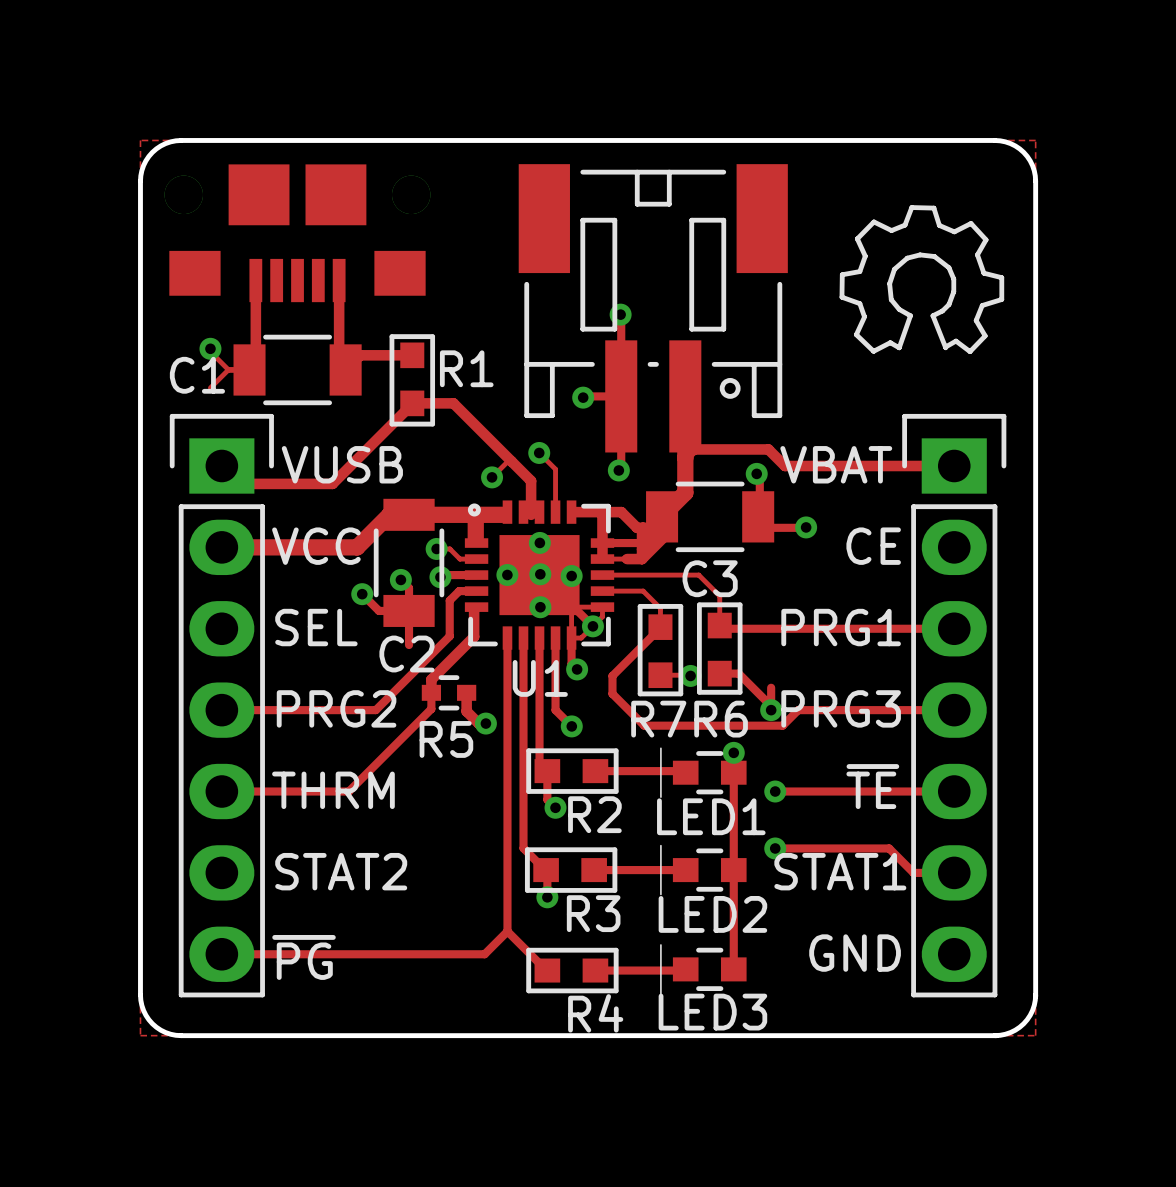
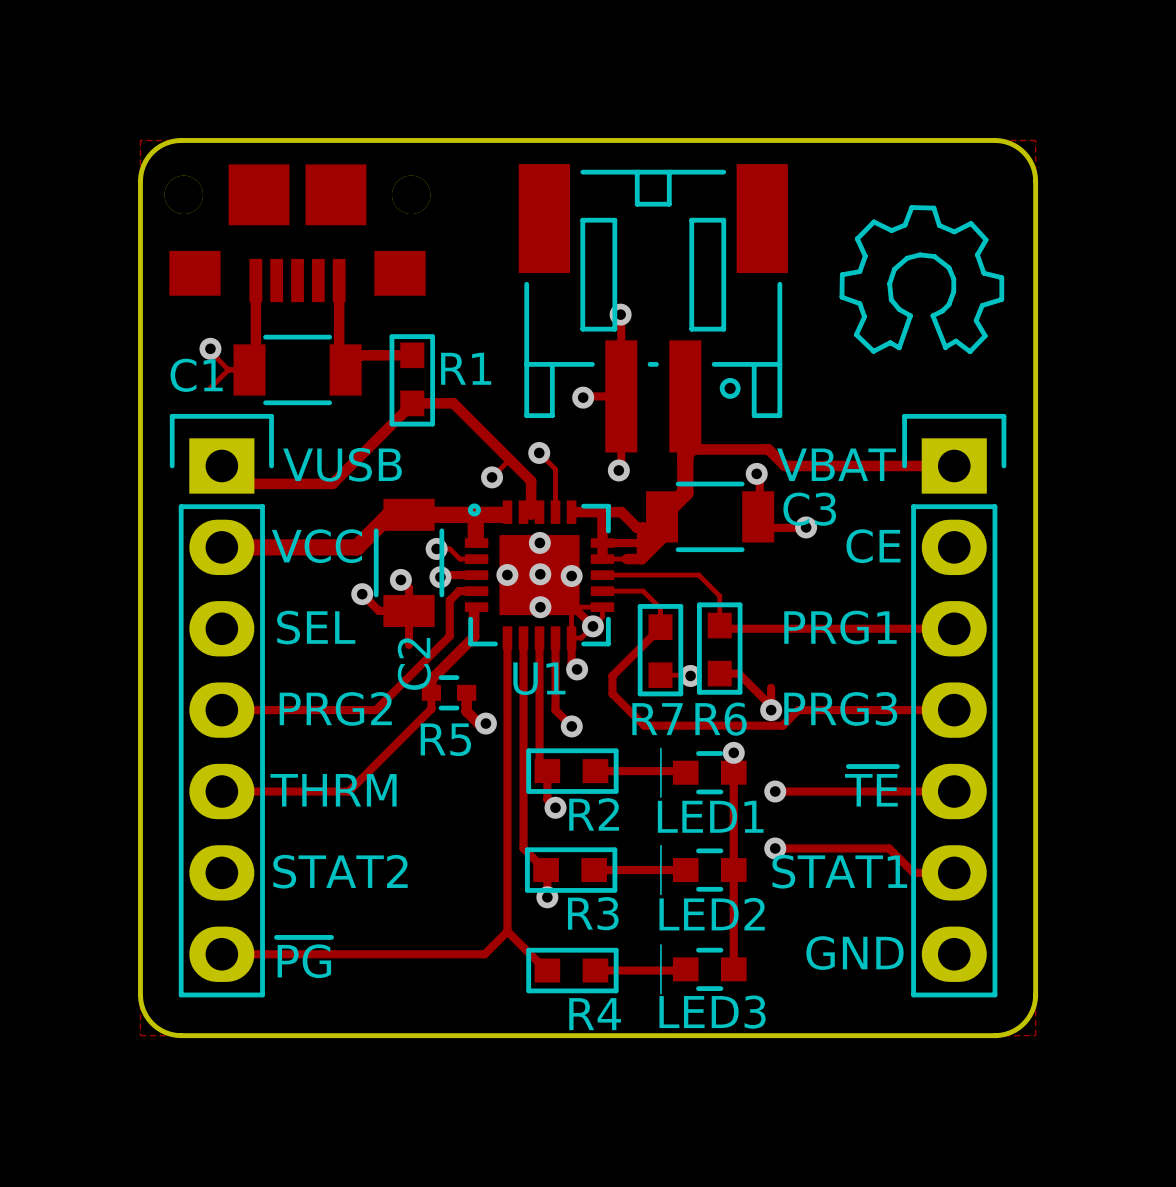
C3 name position: C3 (710, 578) -> C3 (809, 509)
C2 name rotation: 0° (406, 654) -> 90° counterclockwise (414, 663)

